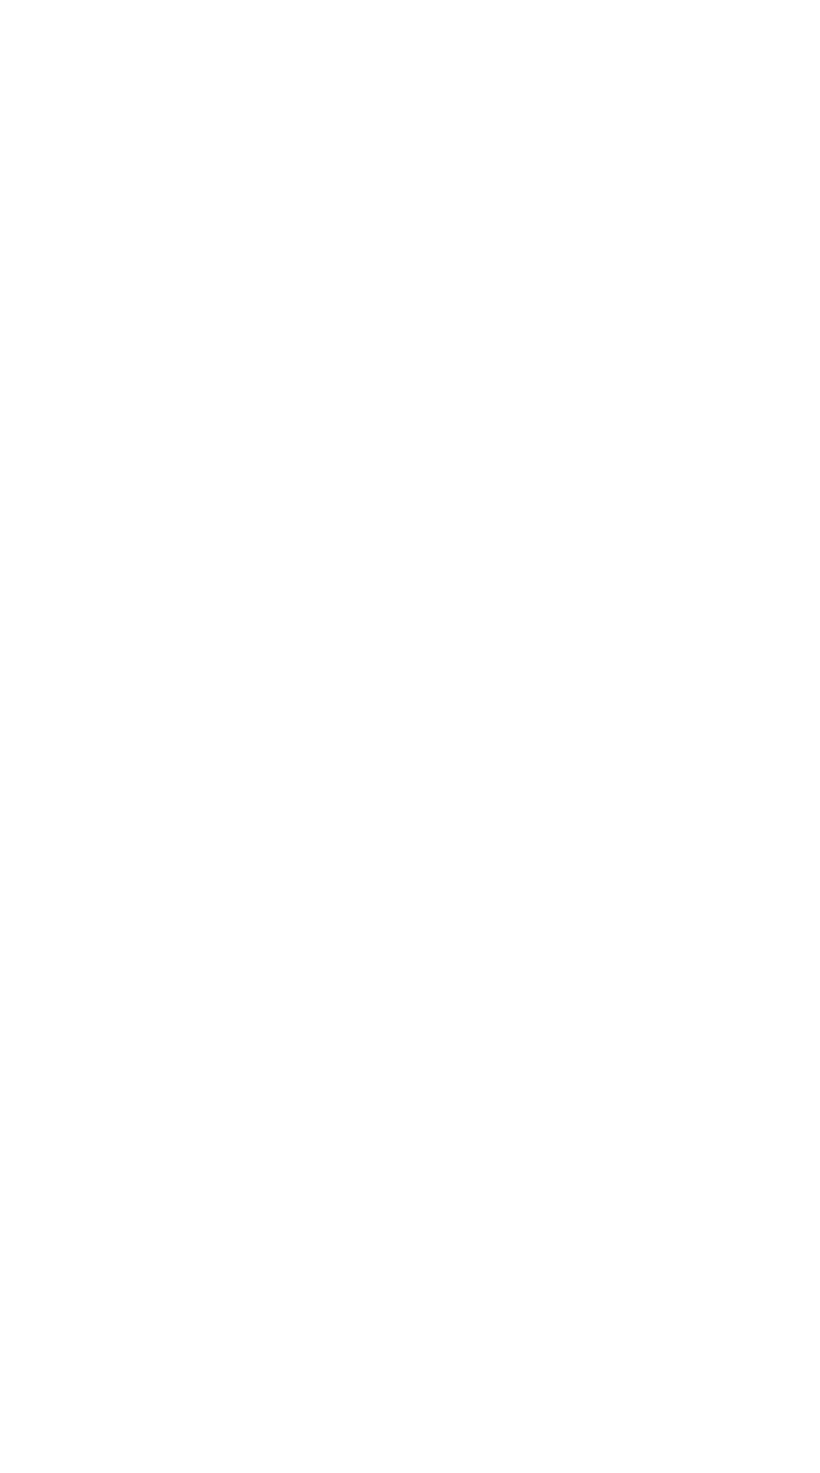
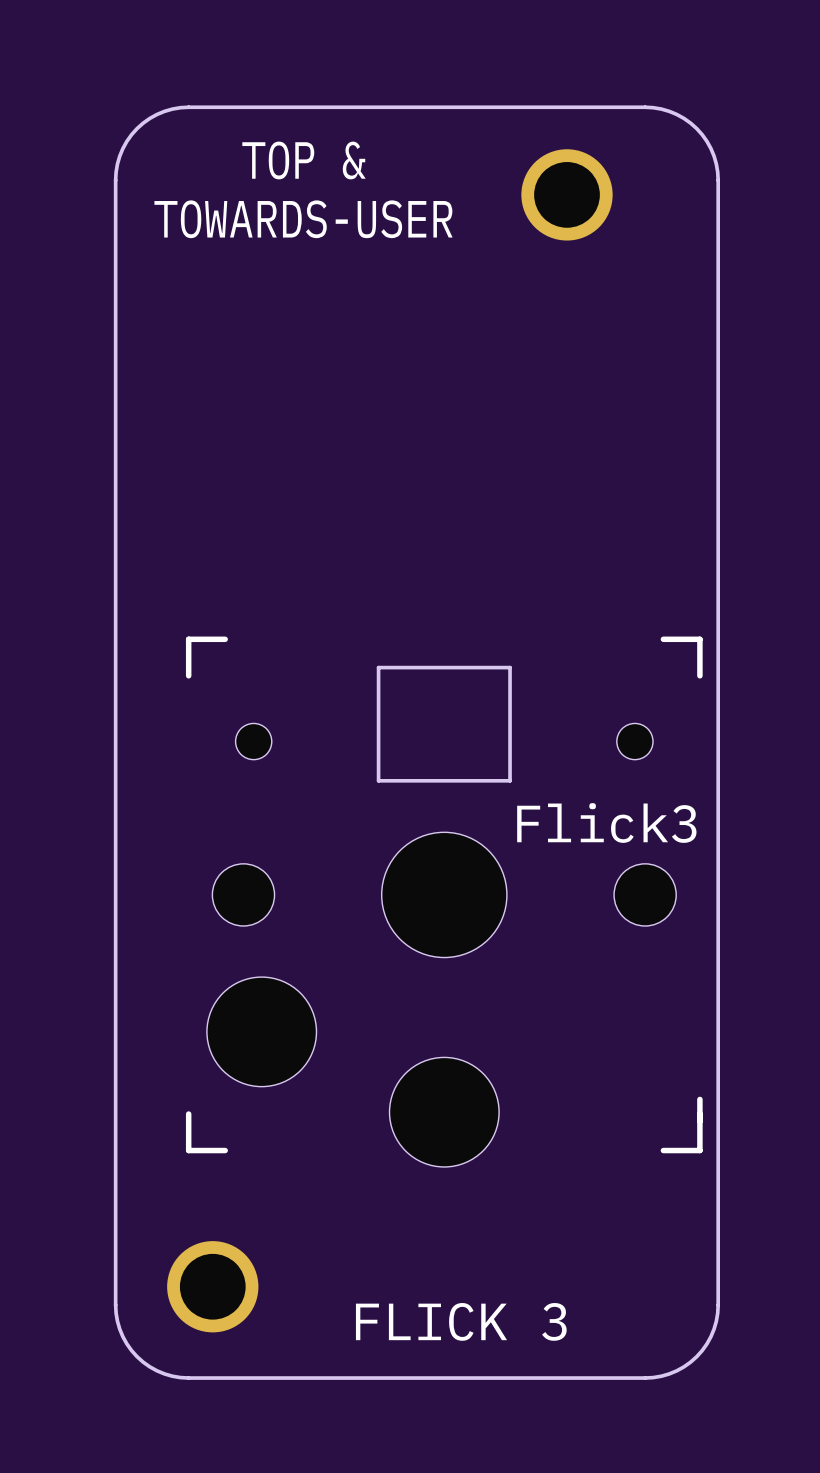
board edge: none -> (188, 107) (653, 107) (669, 111) (690, 123) (706, 141) (714, 156) (718, 180) (718, 1305) (714, 1329) (702, 1350) (690, 1362) (669, 1373) (645, 1378) (180, 1377) (164, 1373) (143, 1362) (126, 1343) (119, 1329) (115, 1305) (116, 172) (122, 148) (137, 128) (156, 114) (172, 109) (188, 107)
text: none -> TOP & (304, 160)
part: none -> (567, 194)
text: none -> TOWARDS-USER (303, 219)
Flick3: none -> (444, 901)
part: none -> (212, 1286)
text: none -> FLICK 3 (461, 1321)

